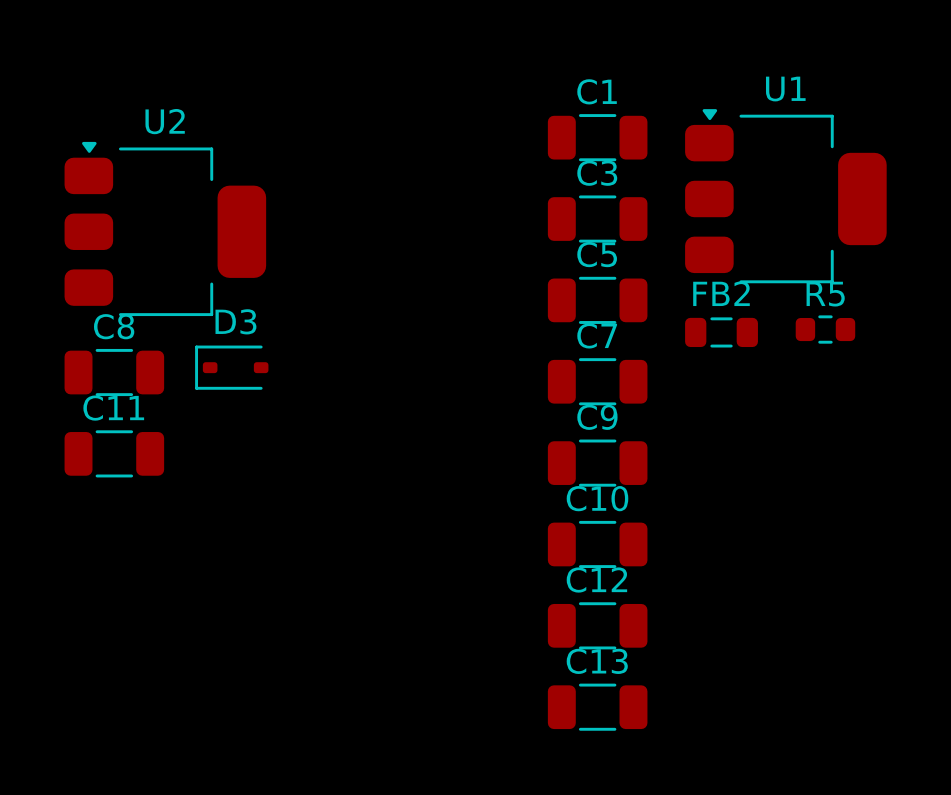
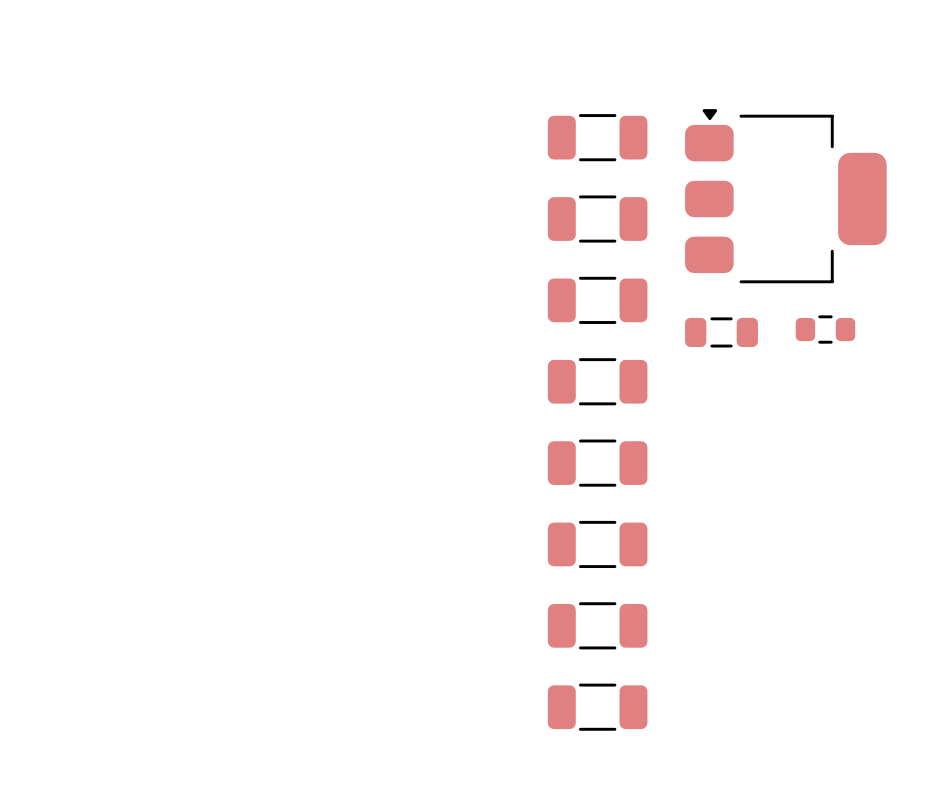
U1 name: U1 (785, 89) -> none
C1 name: C1 (597, 91) -> none
C3 name: C3 (597, 173) -> none
U2: (165, 228) -> none
C5 name: C5 (597, 254) -> none
FB2 name: FB2 (721, 293) -> none
R5 name: R5 (825, 294) -> none
C7 name: C7 (597, 335) -> none
D3: (231, 367) -> none
C8: (114, 372) -> none
C9 name: C9 (597, 417) -> none
C11: (114, 453) -> none
C10 name: C10 (597, 498) -> none
C12 name: C12 (596, 580) -> none
C13 name: C13 (597, 661) -> none

